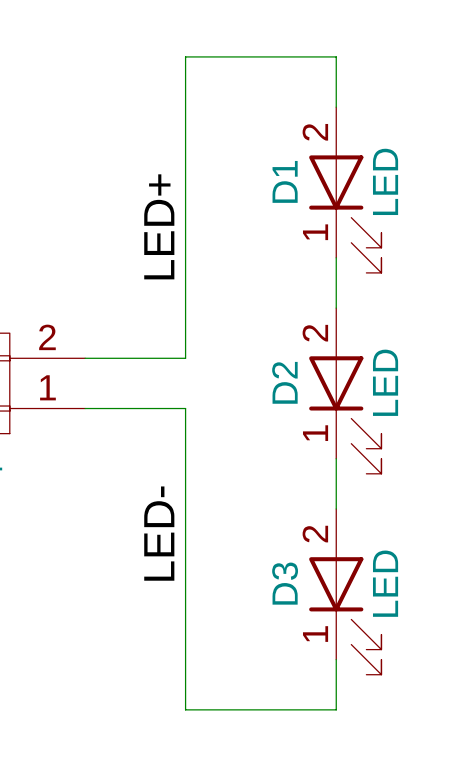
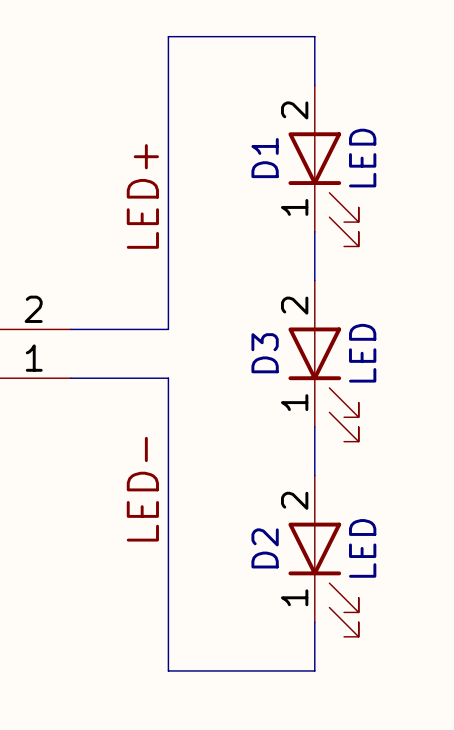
D2 name: D2 (284, 382) -> D3 (265, 353)
D3 name: D3 (285, 583) -> D2 (265, 548)

